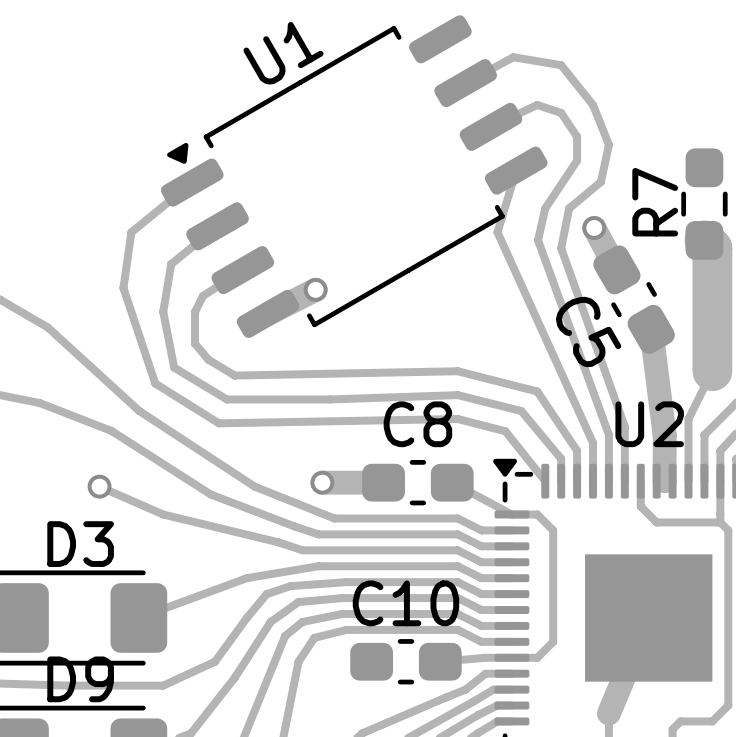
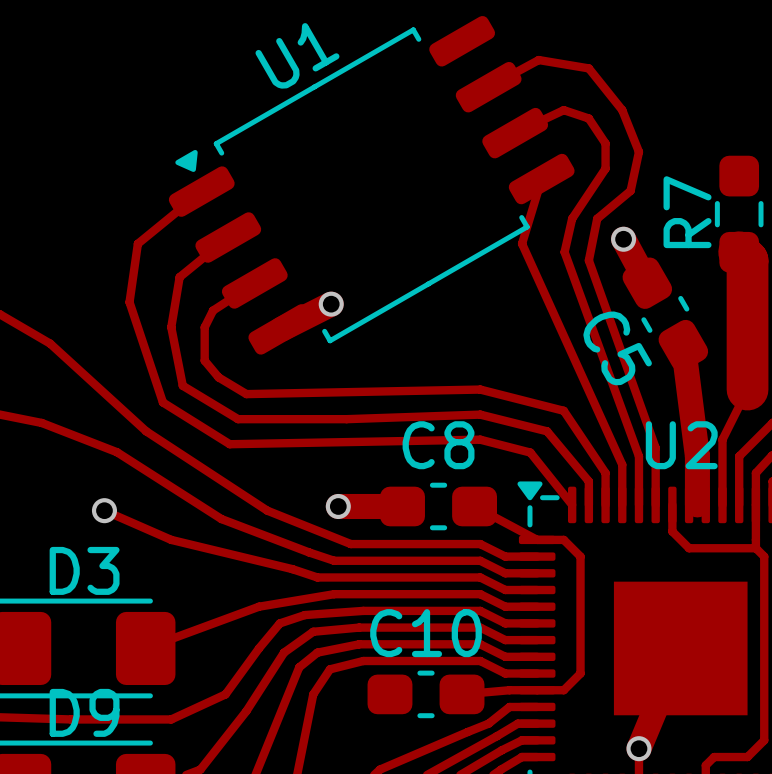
via: none -> (638, 748)

